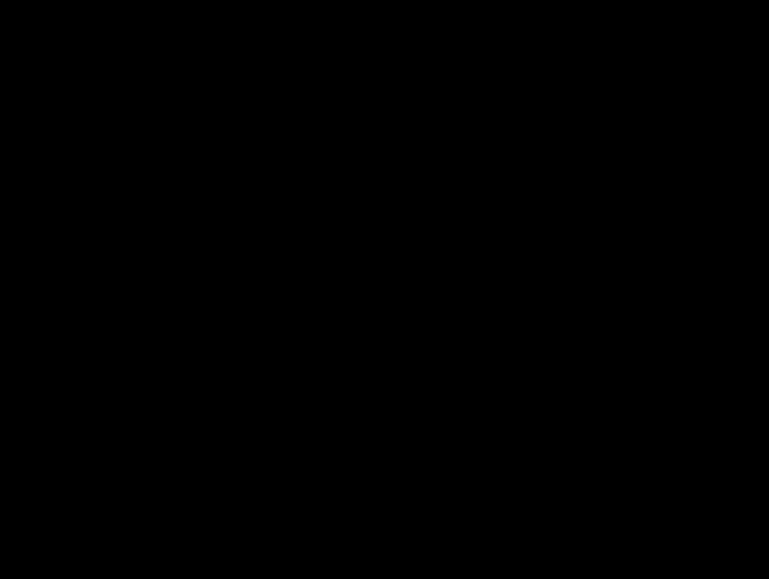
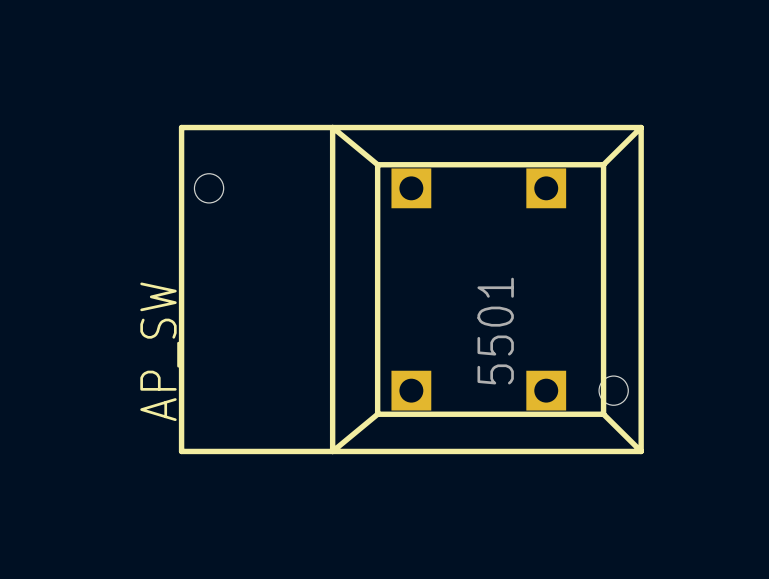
AP_SW: none -> 5501 (411, 289)

